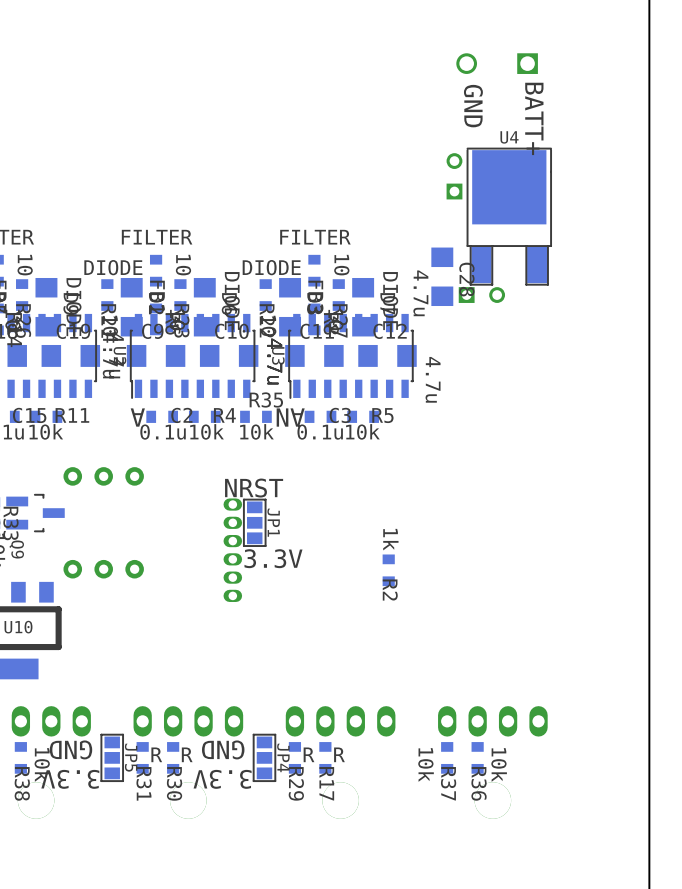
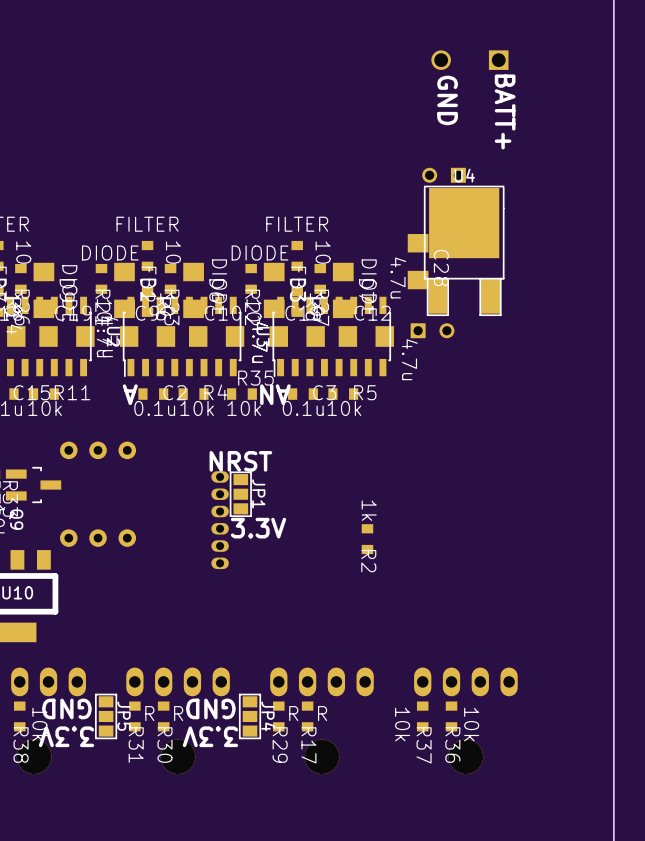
part rotation: 0° (454, 176) -> 90° counterclockwise (444, 175)
U4 position: (509, 216) -> (464, 250)
part: (481, 295) -> none
part: none -> (432, 330)

